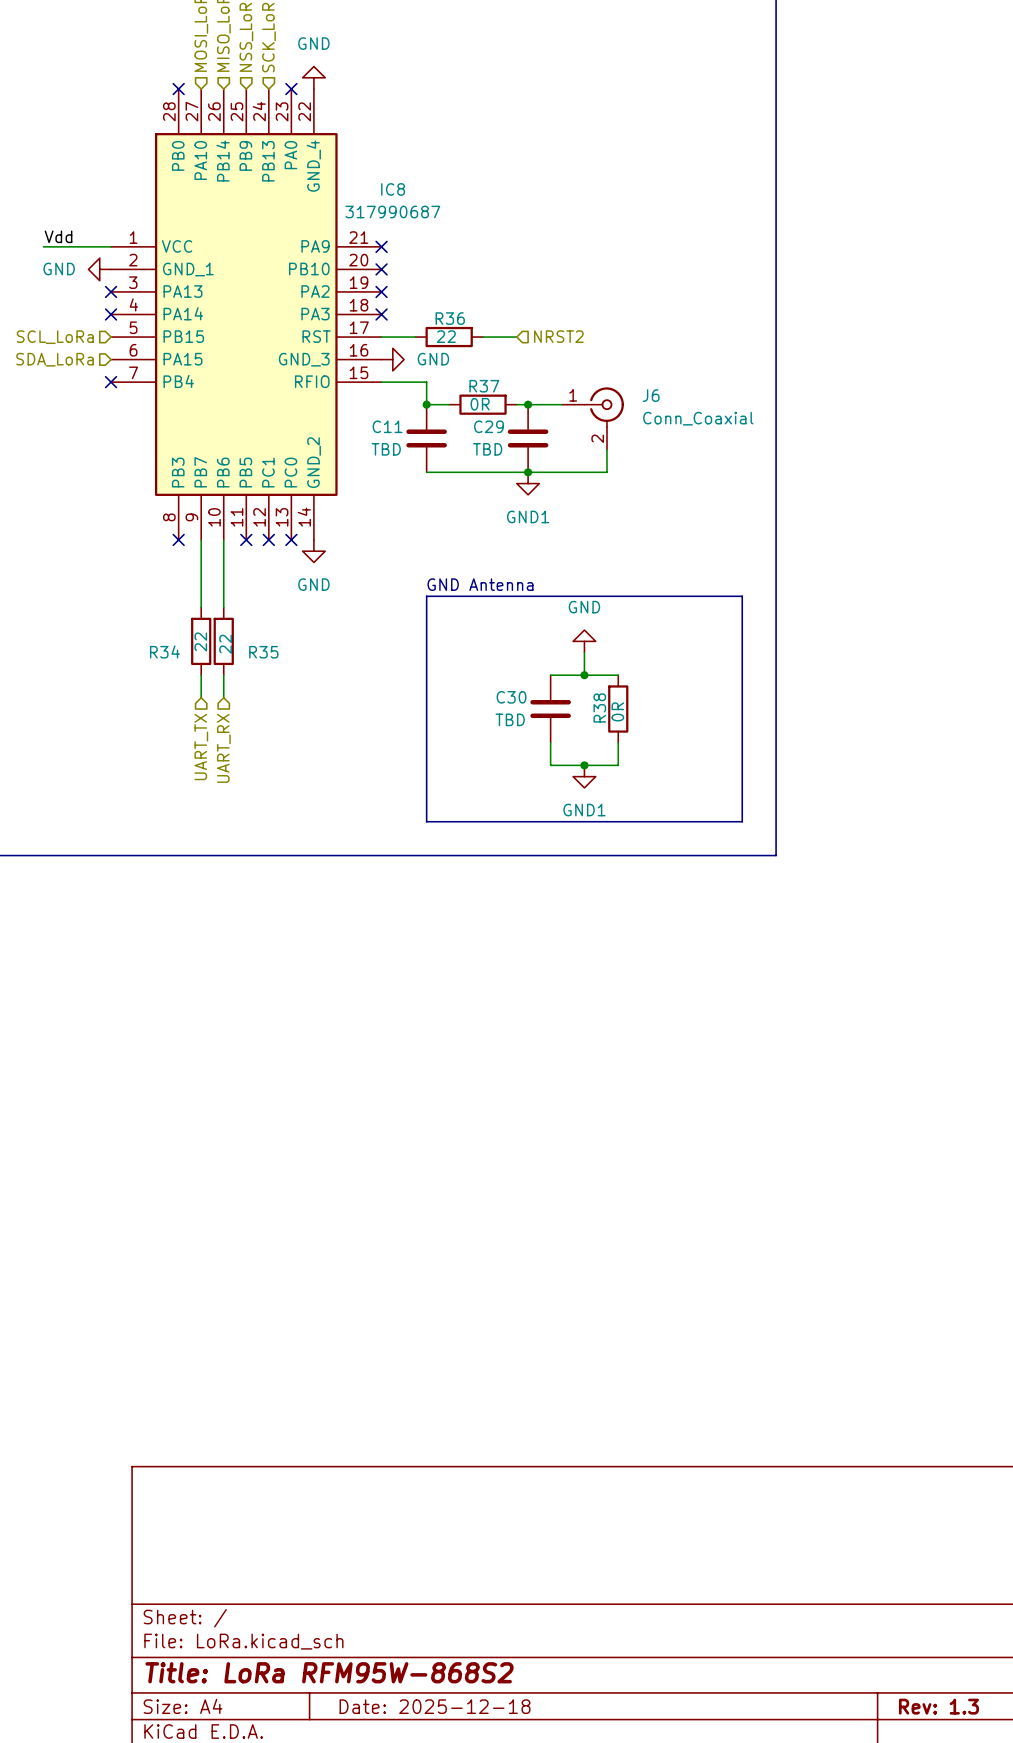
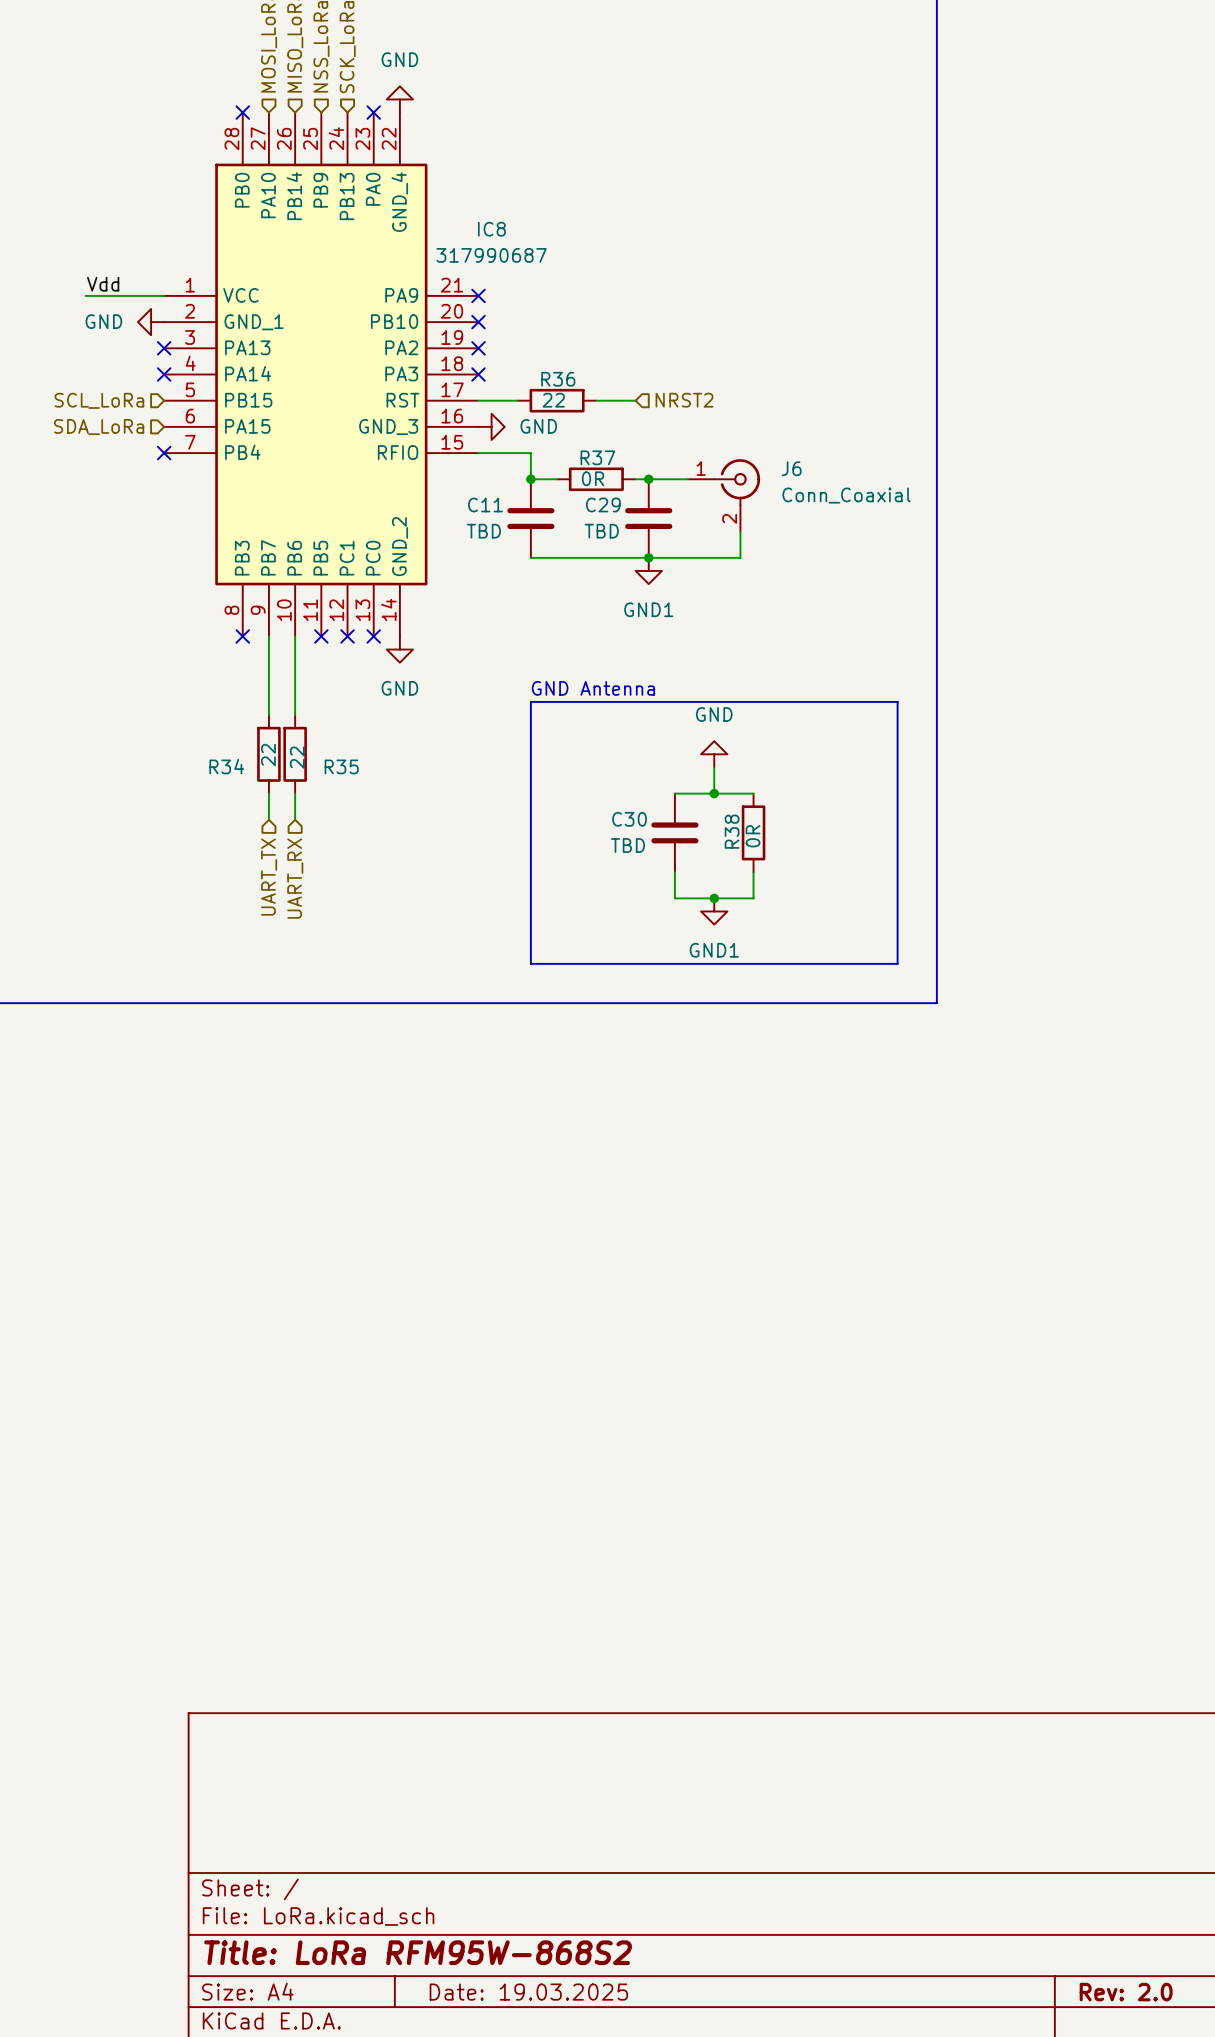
title block: Date: 2025-12-18 (435, 1706) -> Date: 19.03.2025 (528, 1992)
title block: Rev: 1.3 (938, 1706) -> Rev: 2.0 (1126, 1992)

